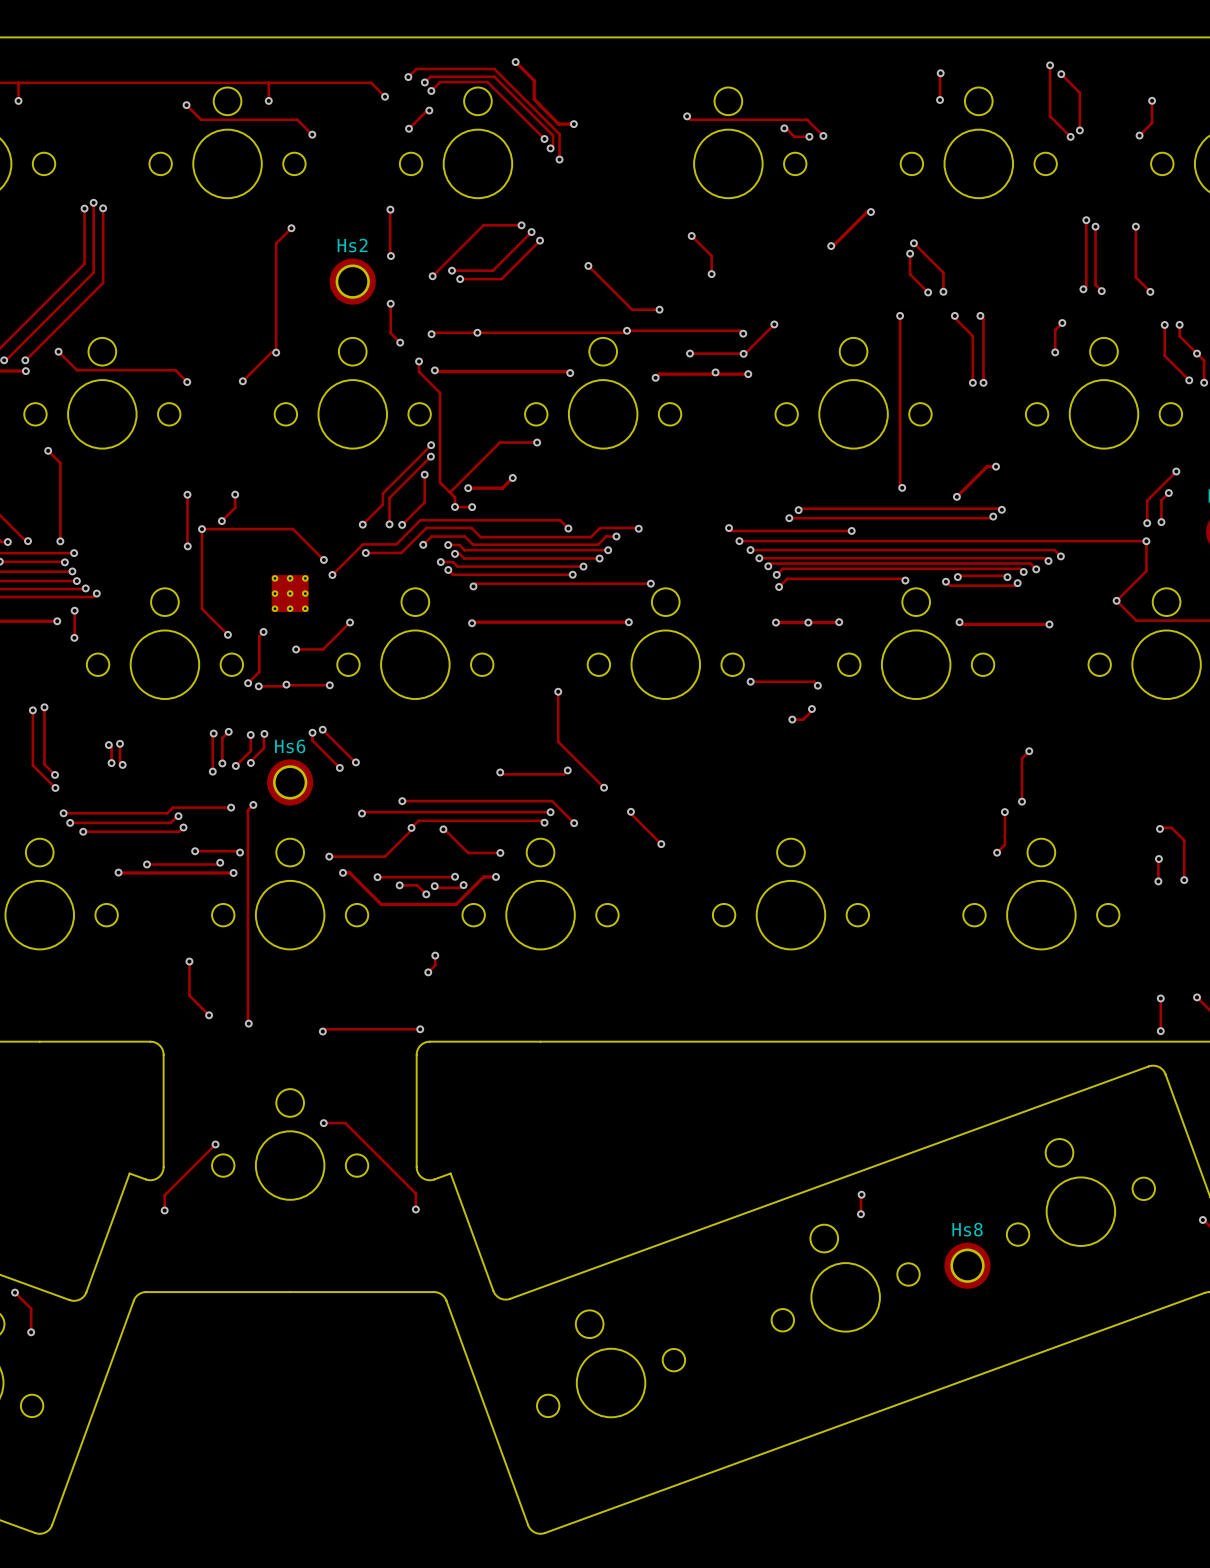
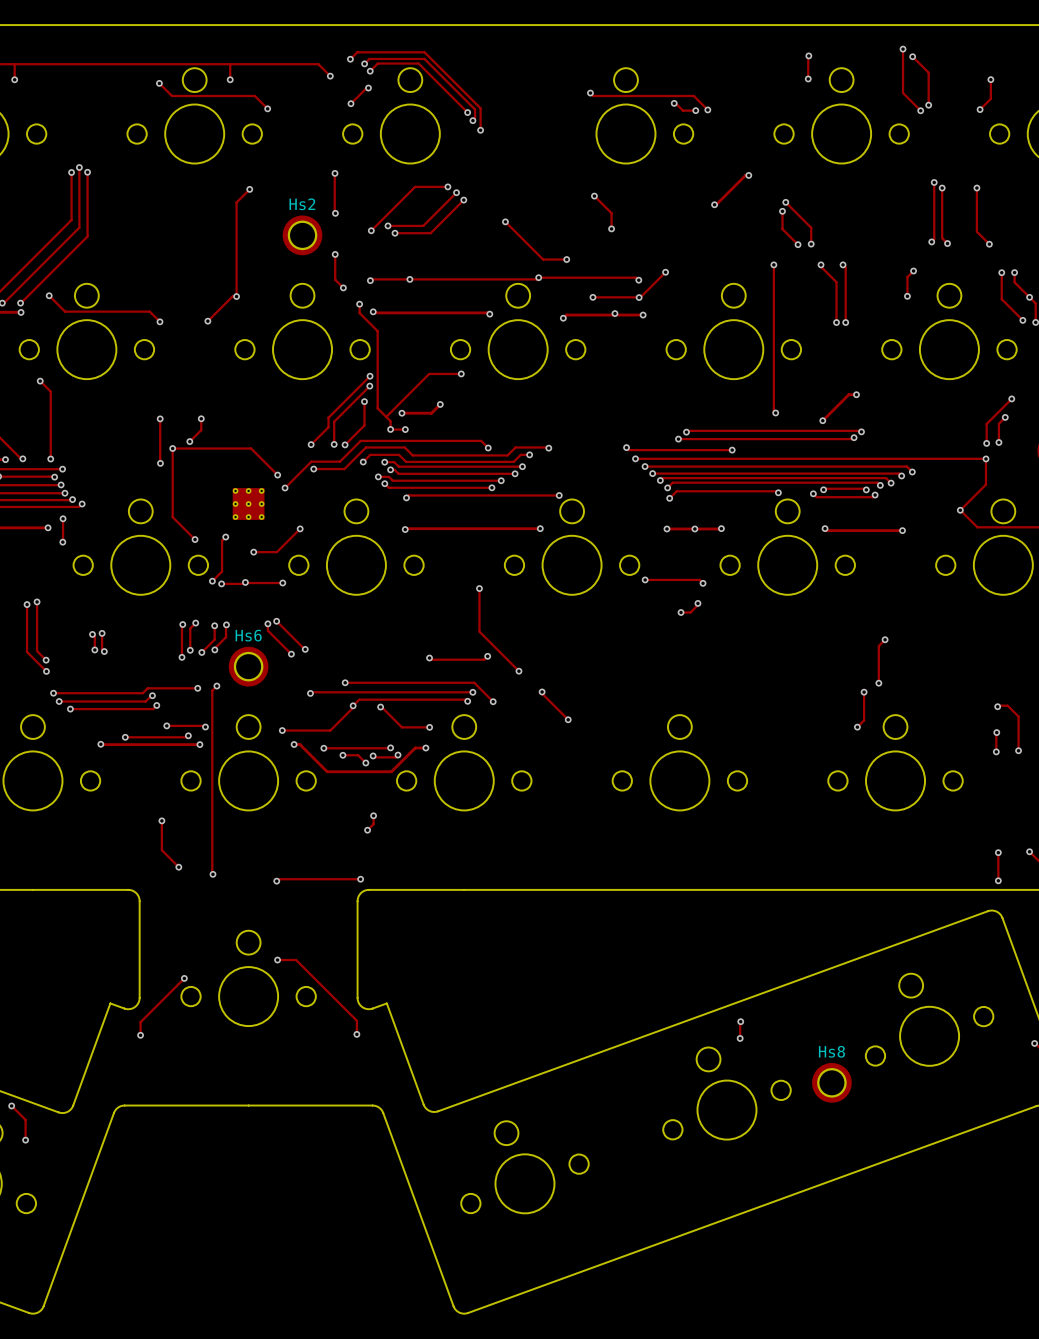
track: (515, 62) (534, 80) (534, 99) (538, 104) (558, 124) (573, 124) -> none
via: (515, 62) -> none
via: (573, 124) -> none

